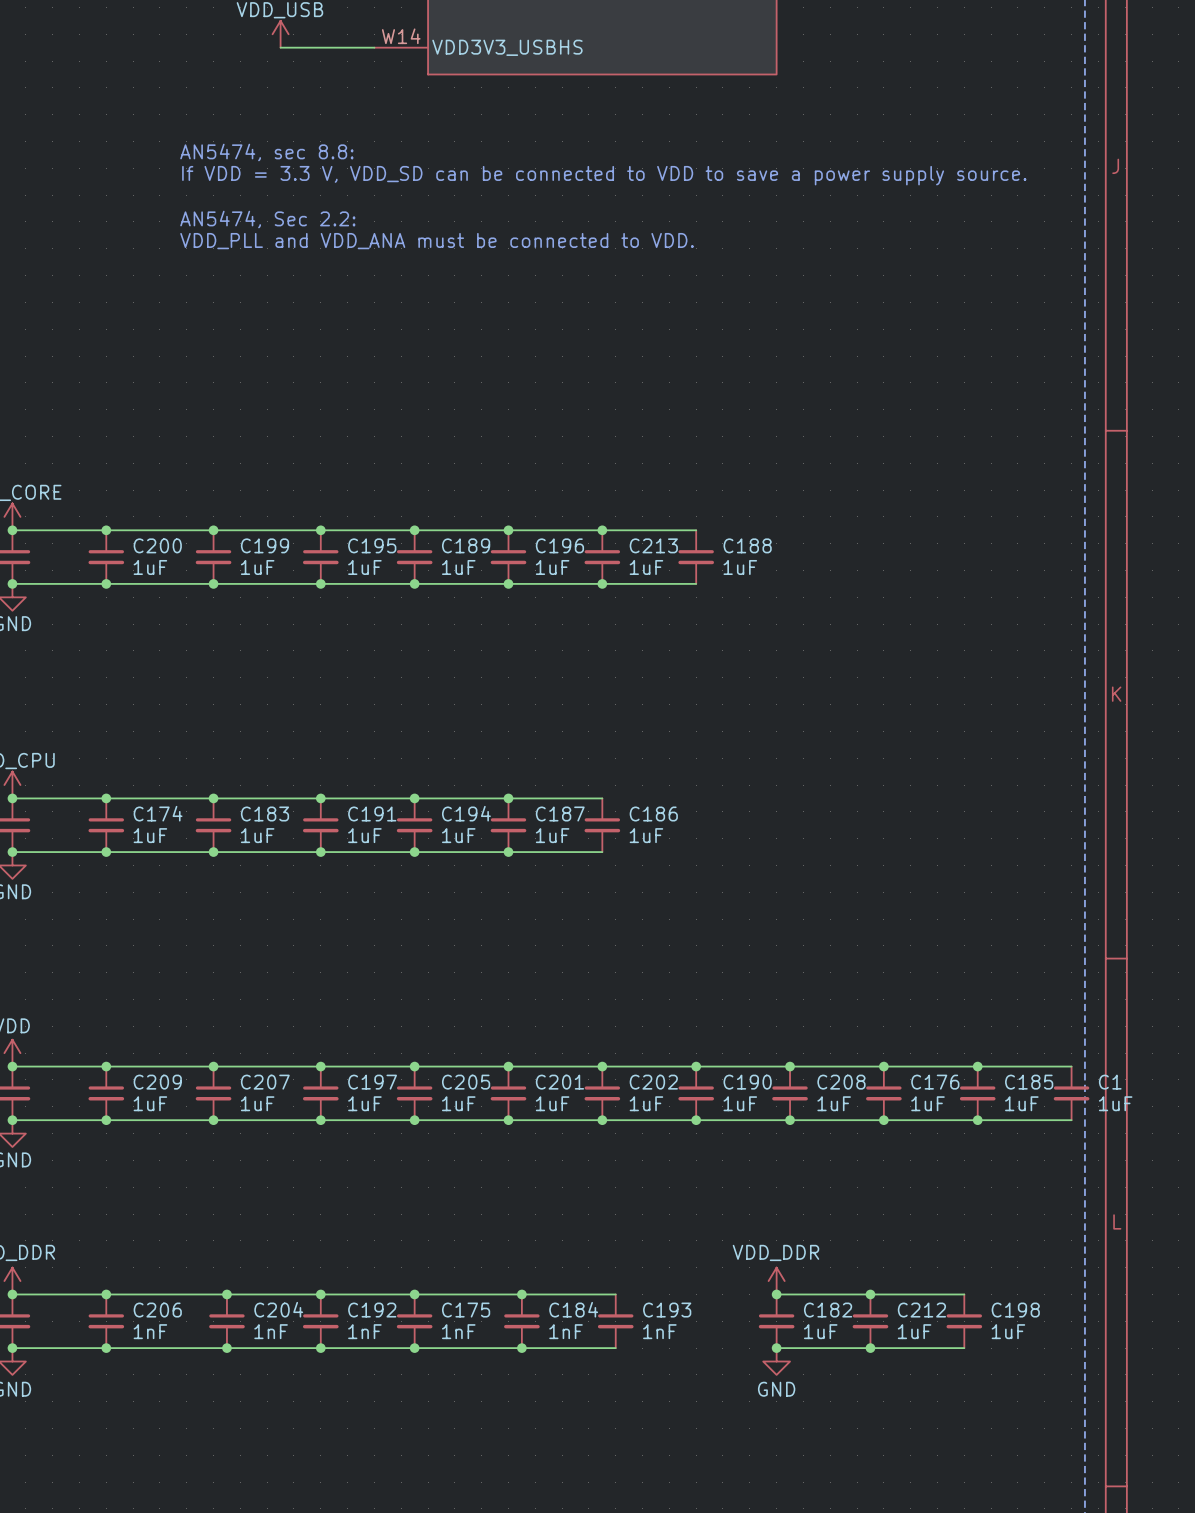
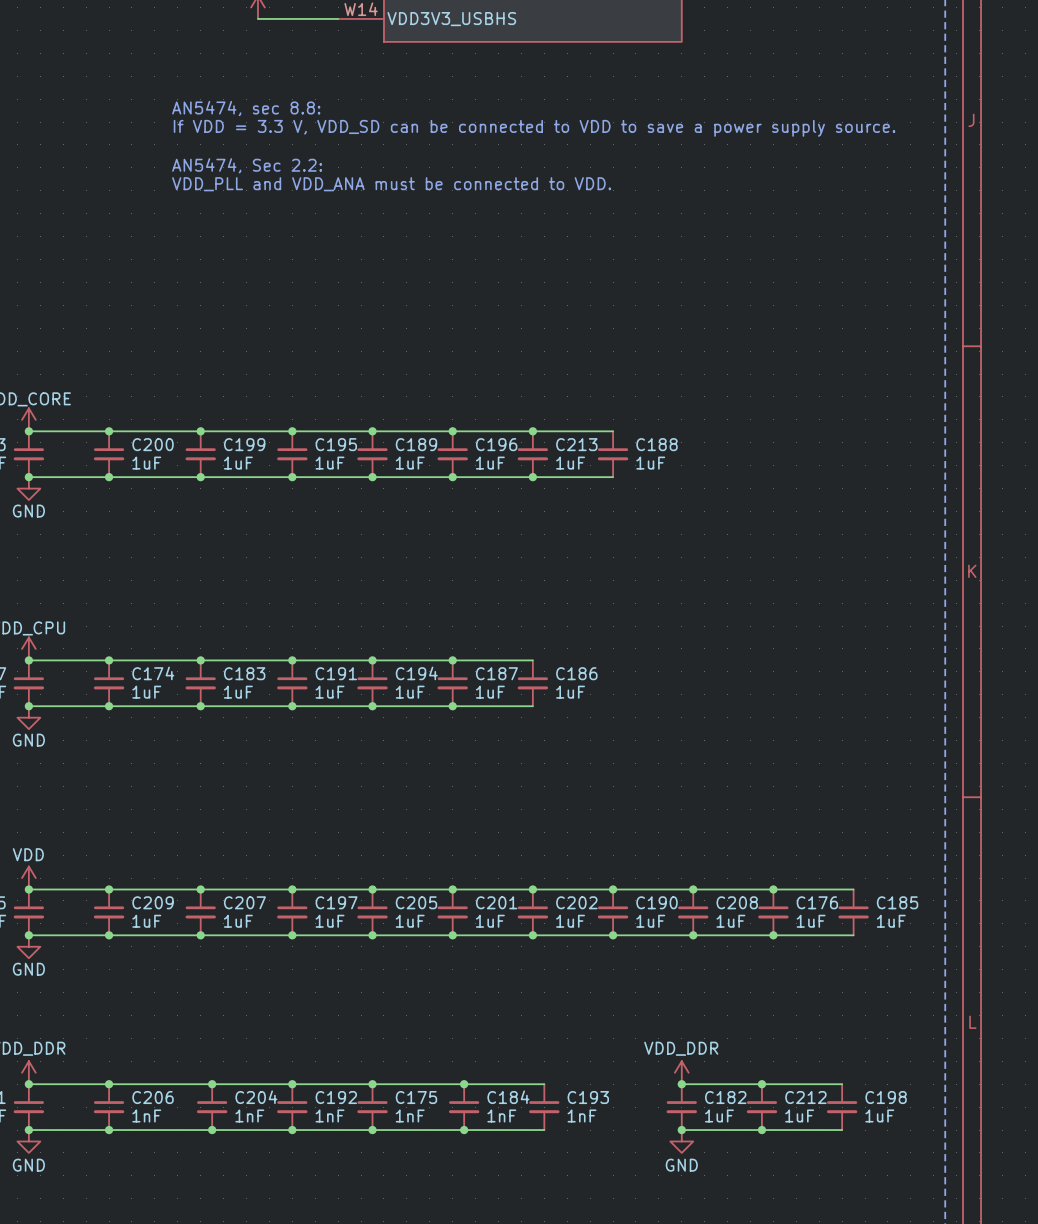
wire: (977, 1066) (1071, 1066) -> none
junction: (977, 1066) -> none
C1: (1071, 1093) -> none
wire: (977, 1120) (1071, 1120) -> none
junction: (977, 1120) -> none

